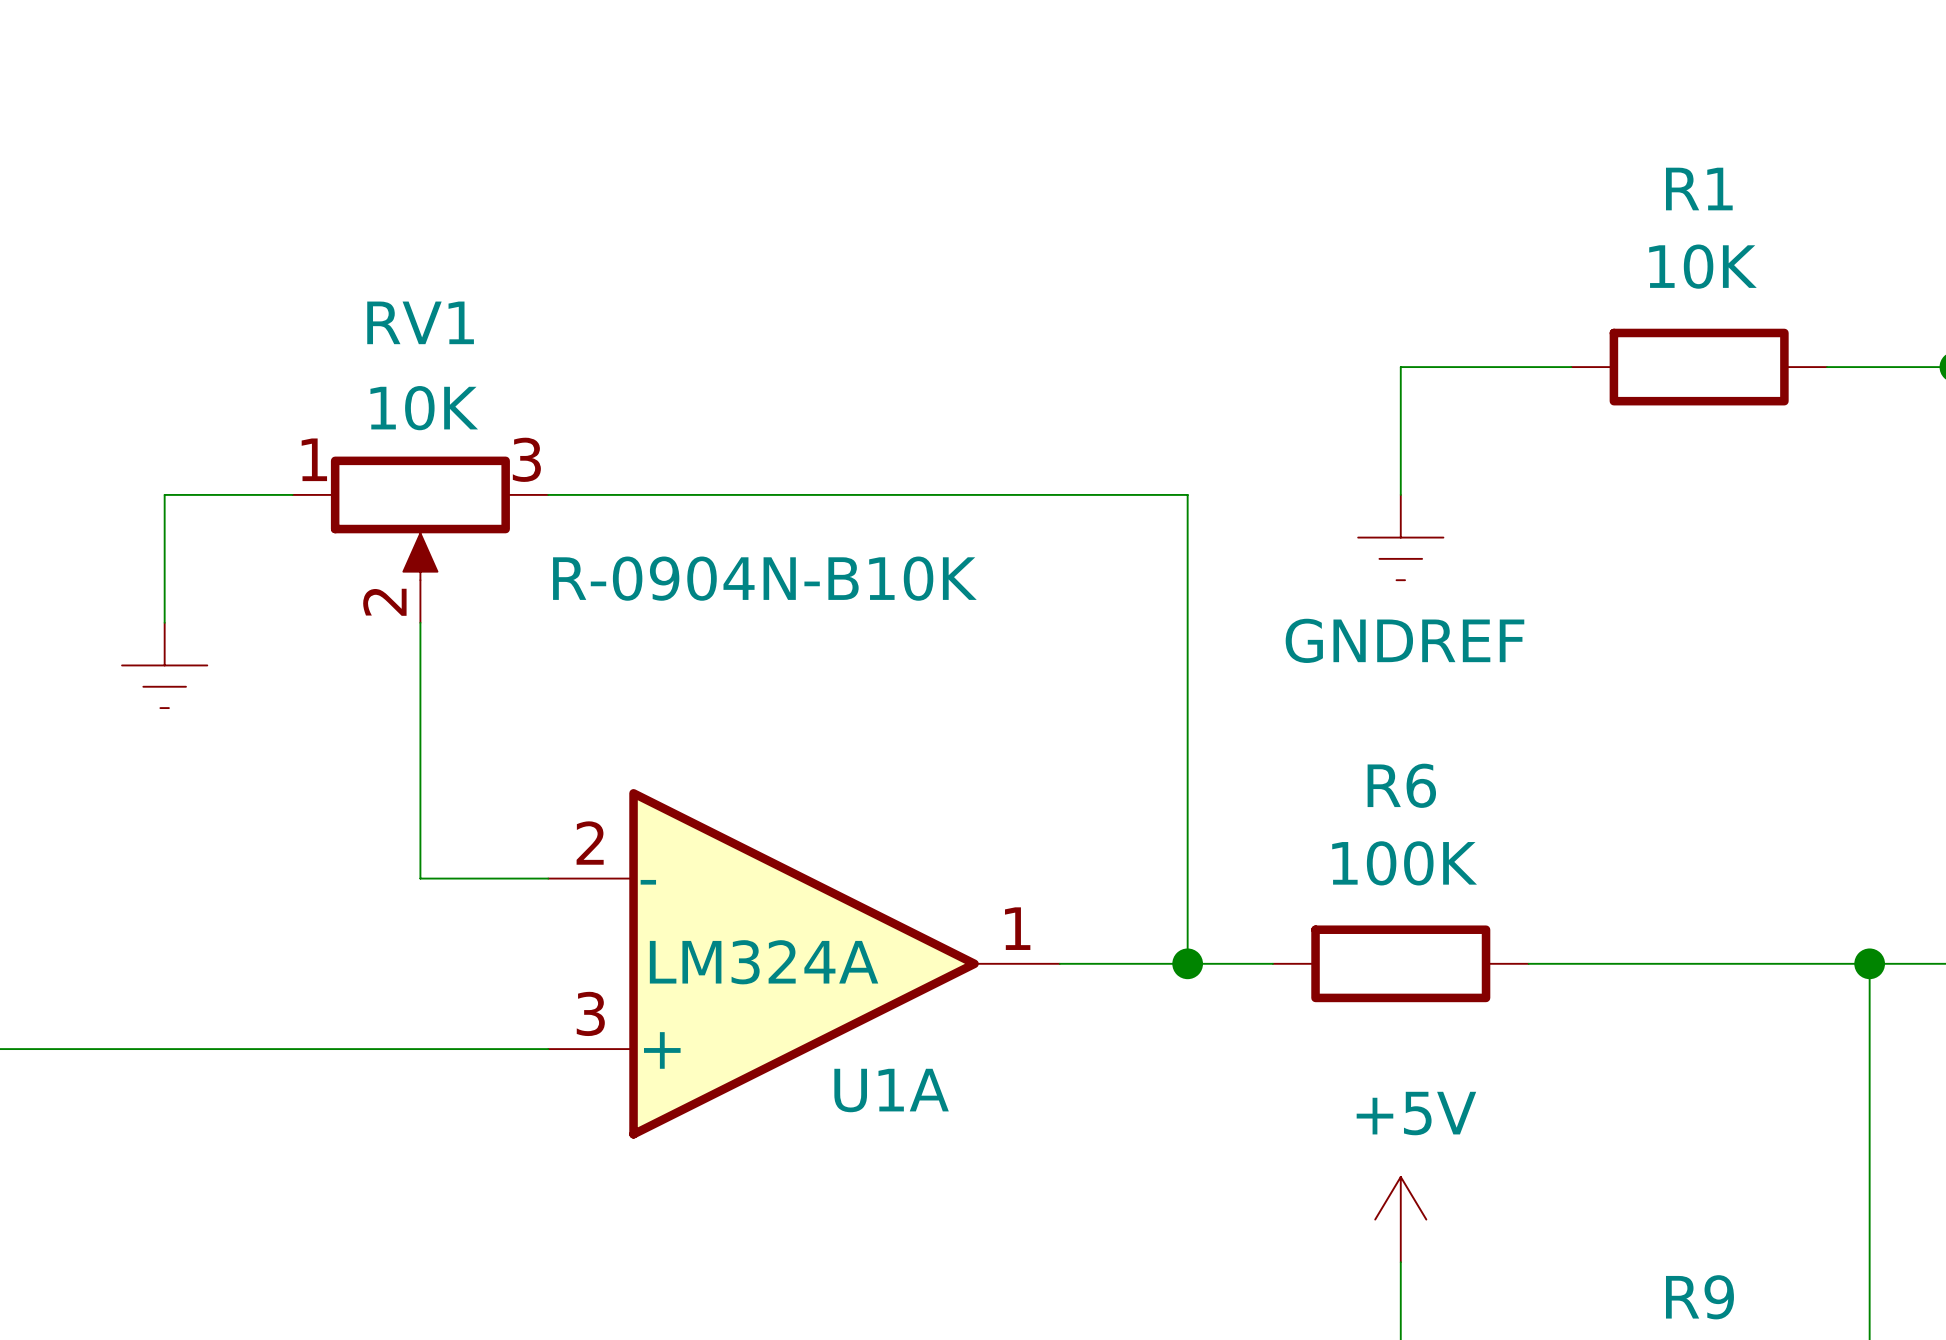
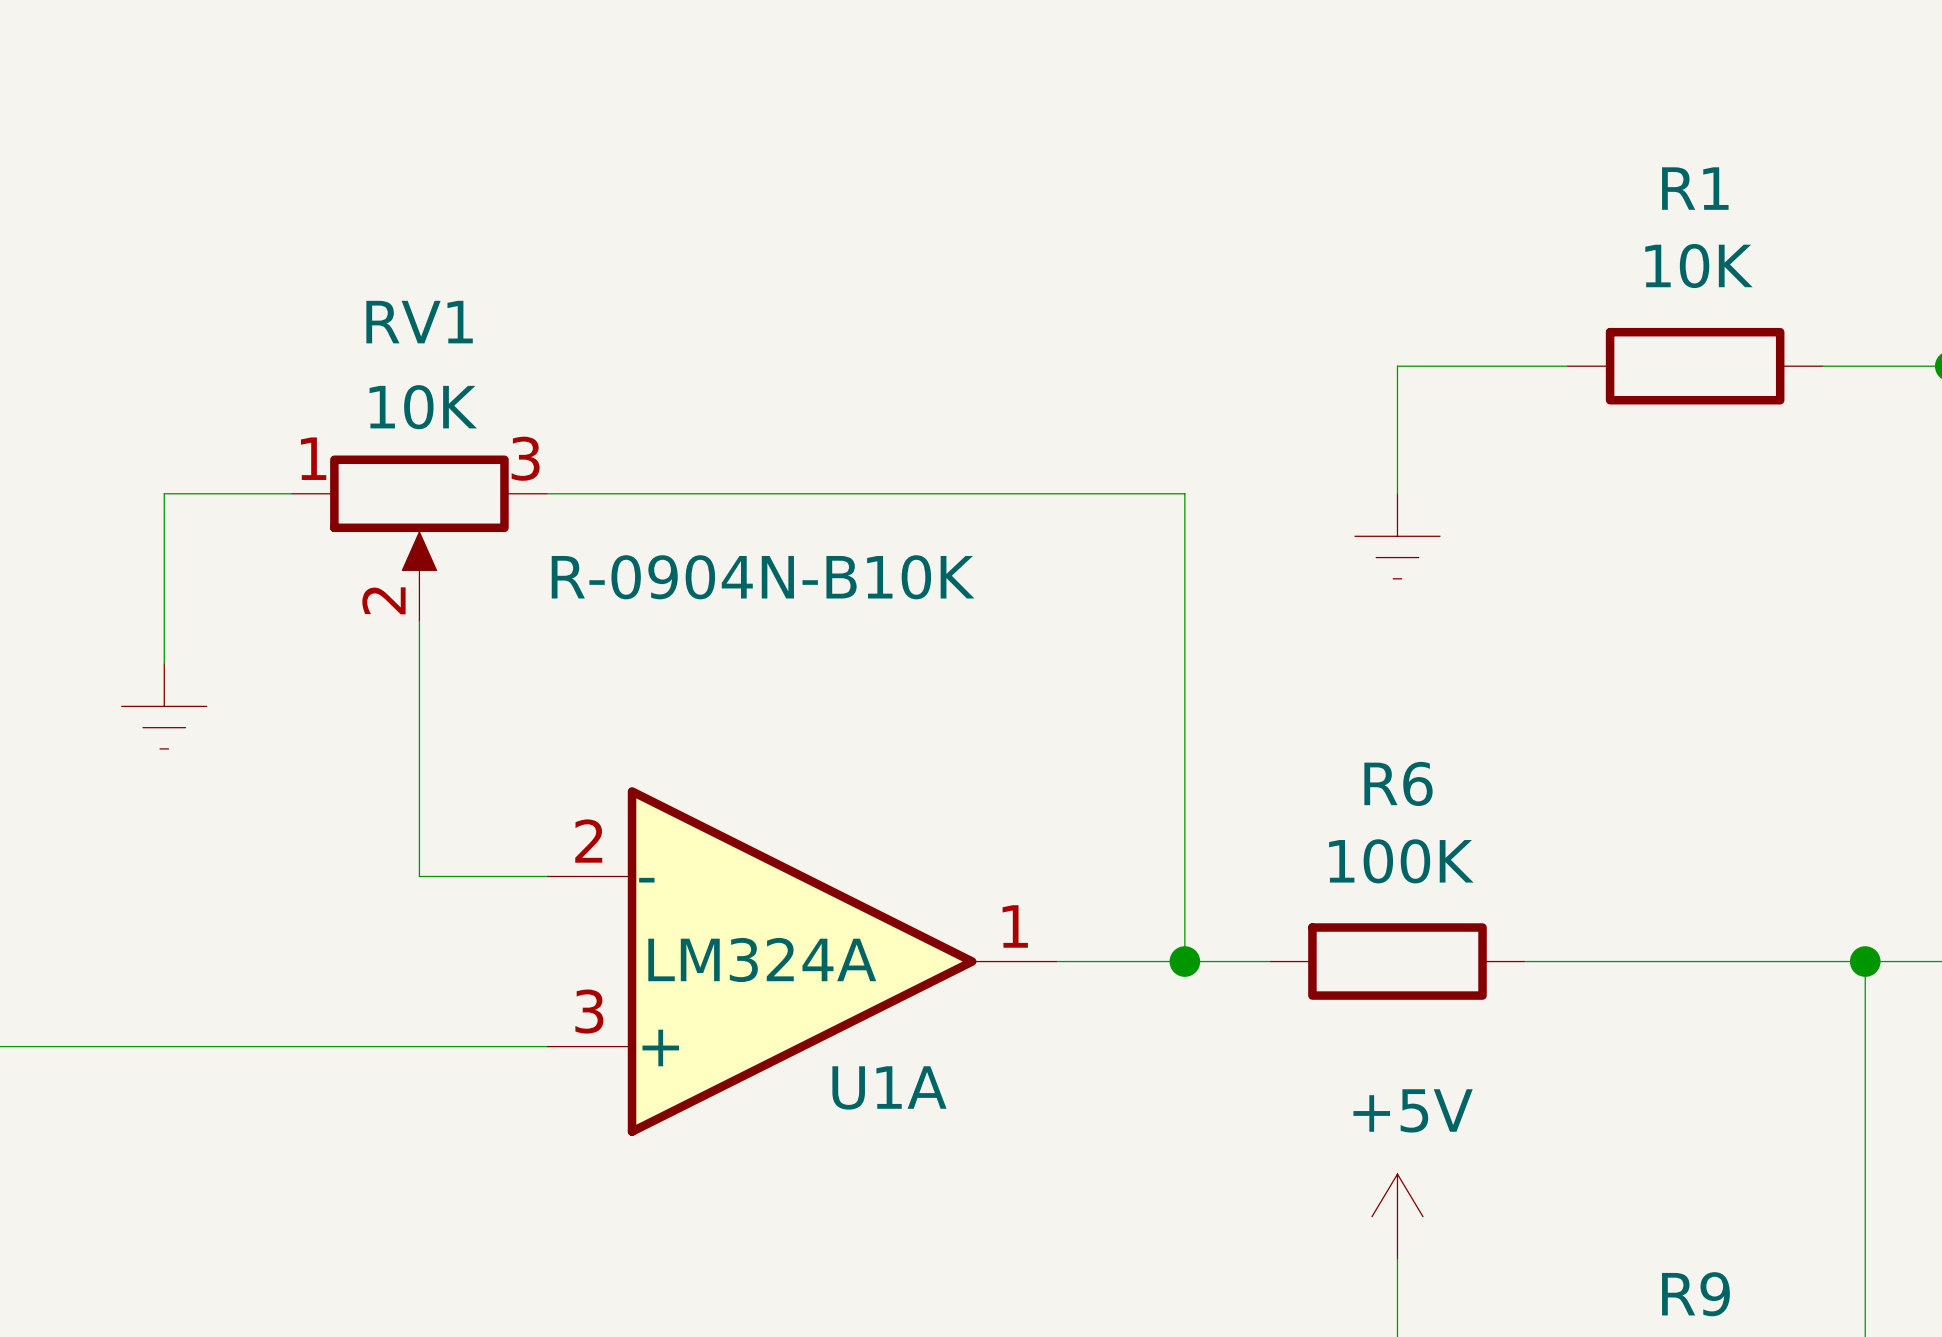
power symbol text: GNDREF (1404, 640) -> none
power symbol position: (164, 665) -> (164, 706)

